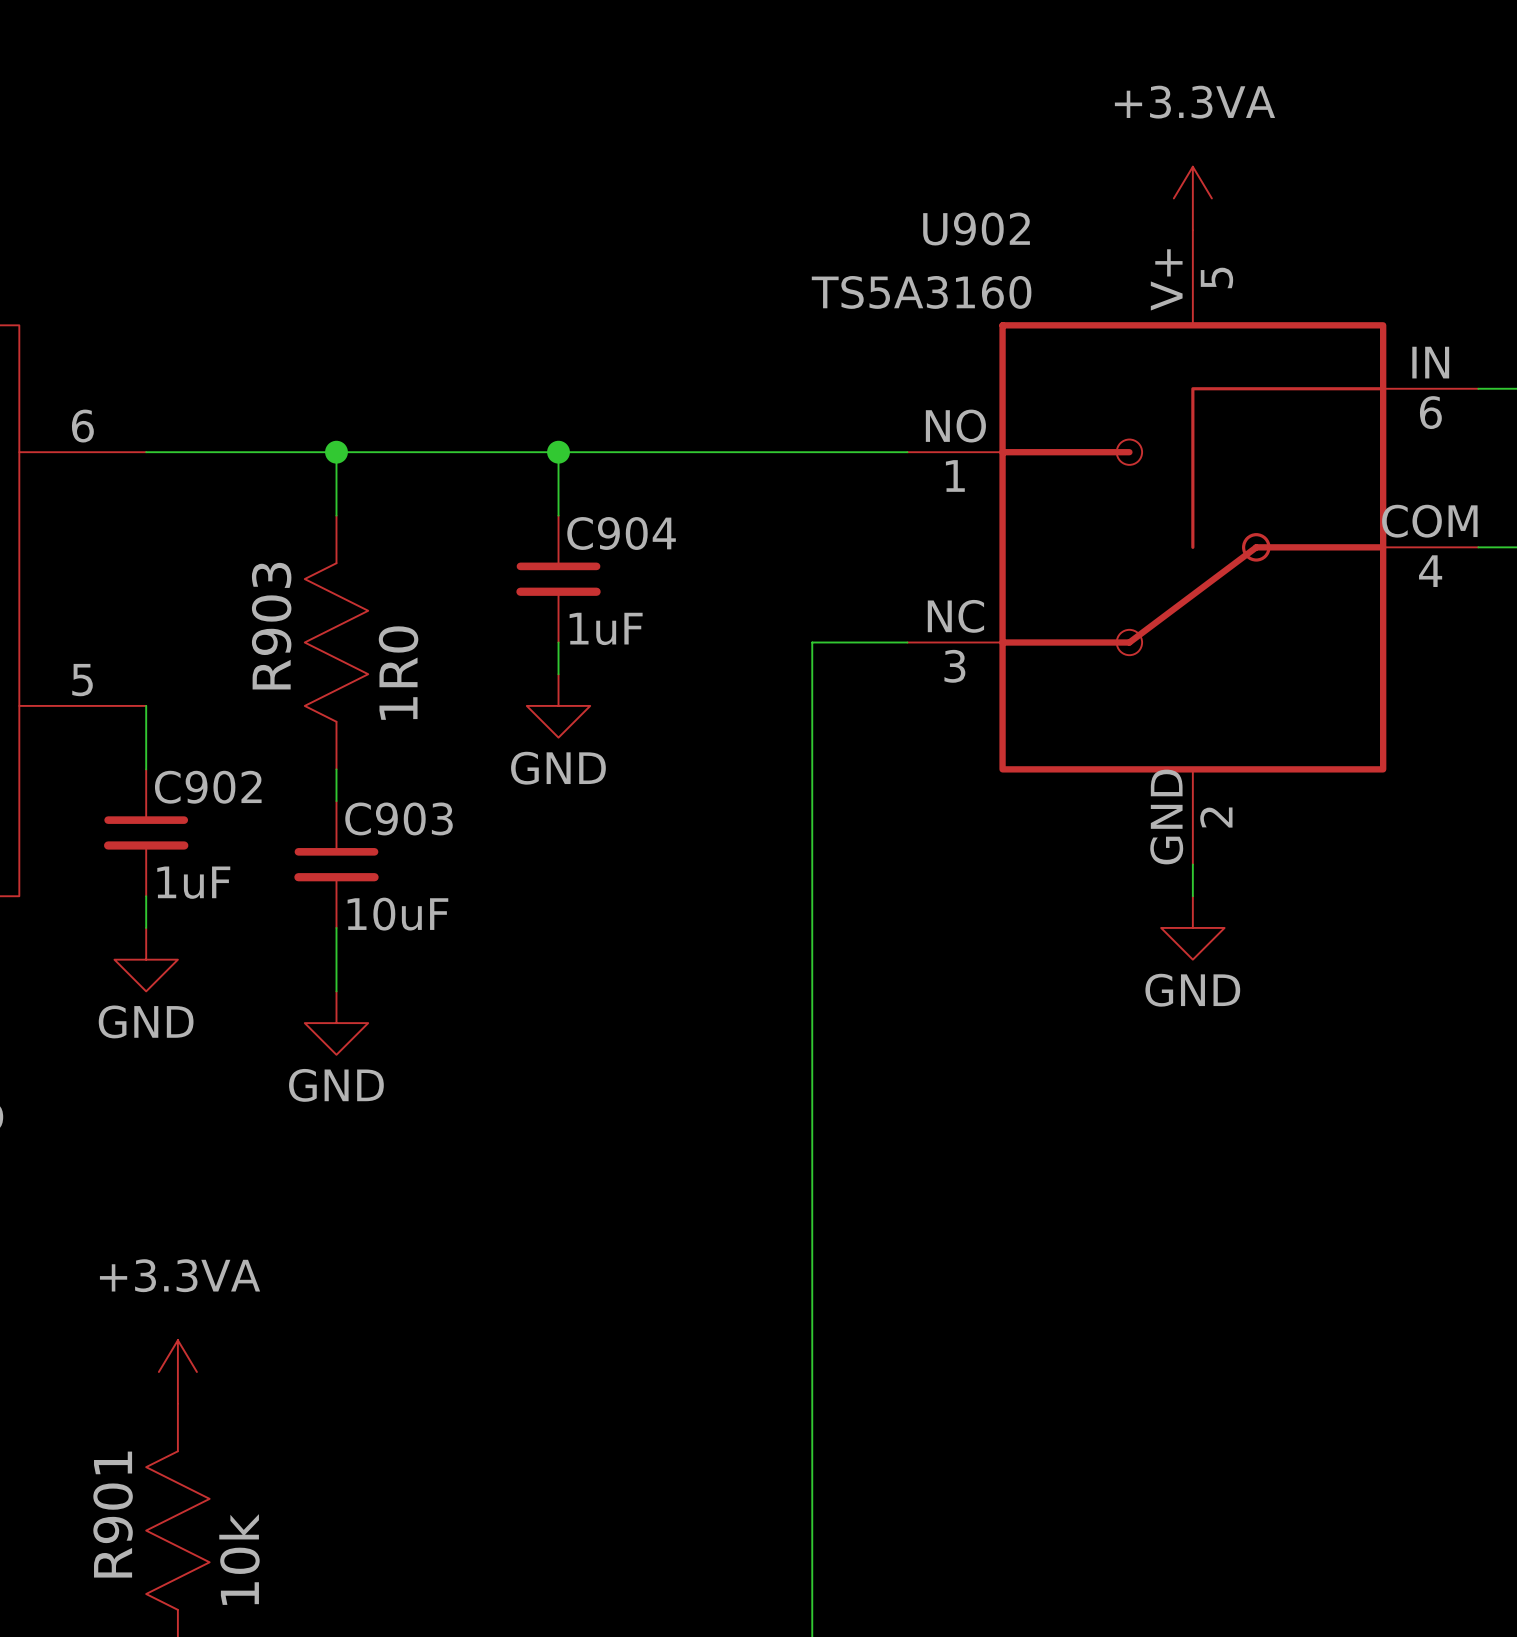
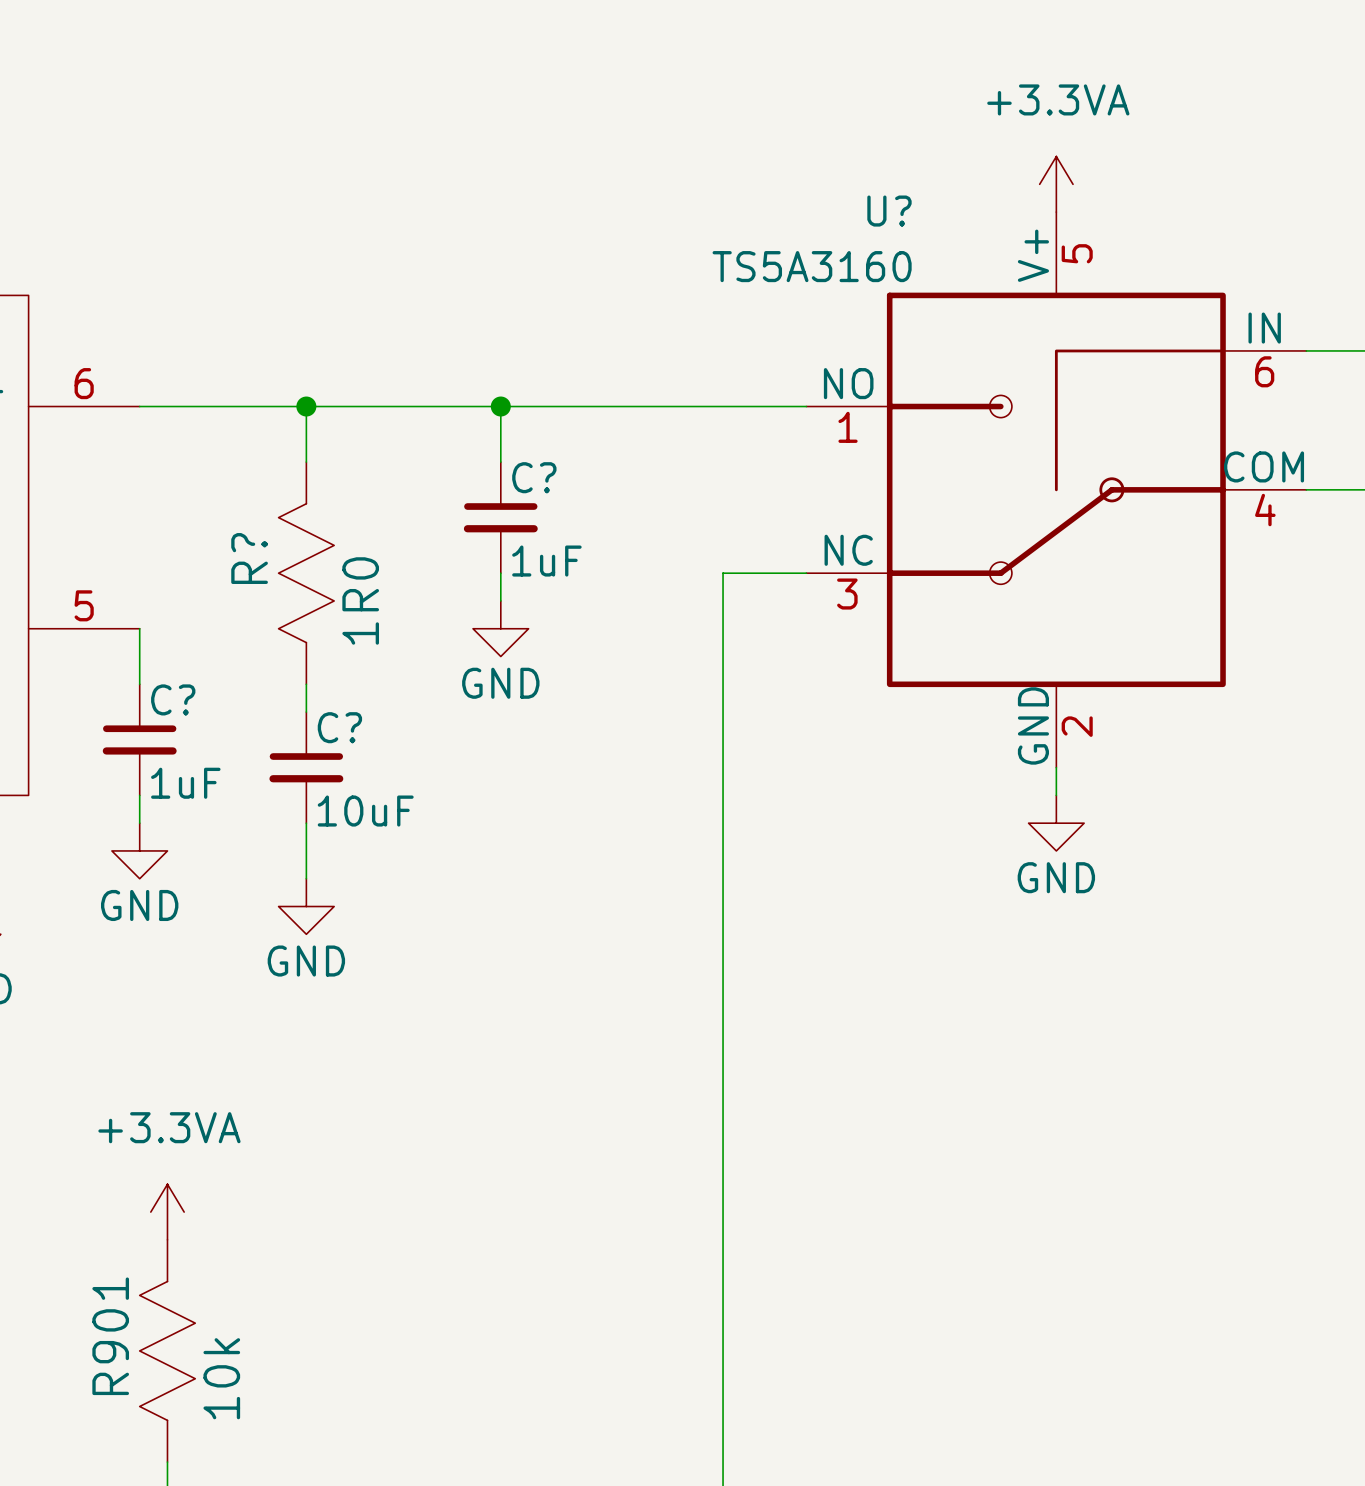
U902 name: U902 (976, 229) -> U? (889, 211)
C904 name: C904 (621, 533) -> C? (534, 477)
R903 name: R903 (271, 626) -> R? (249, 558)
C902 name: C902 (208, 787) -> C? (173, 699)
C903 name: C903 (399, 818) -> C? (339, 727)

